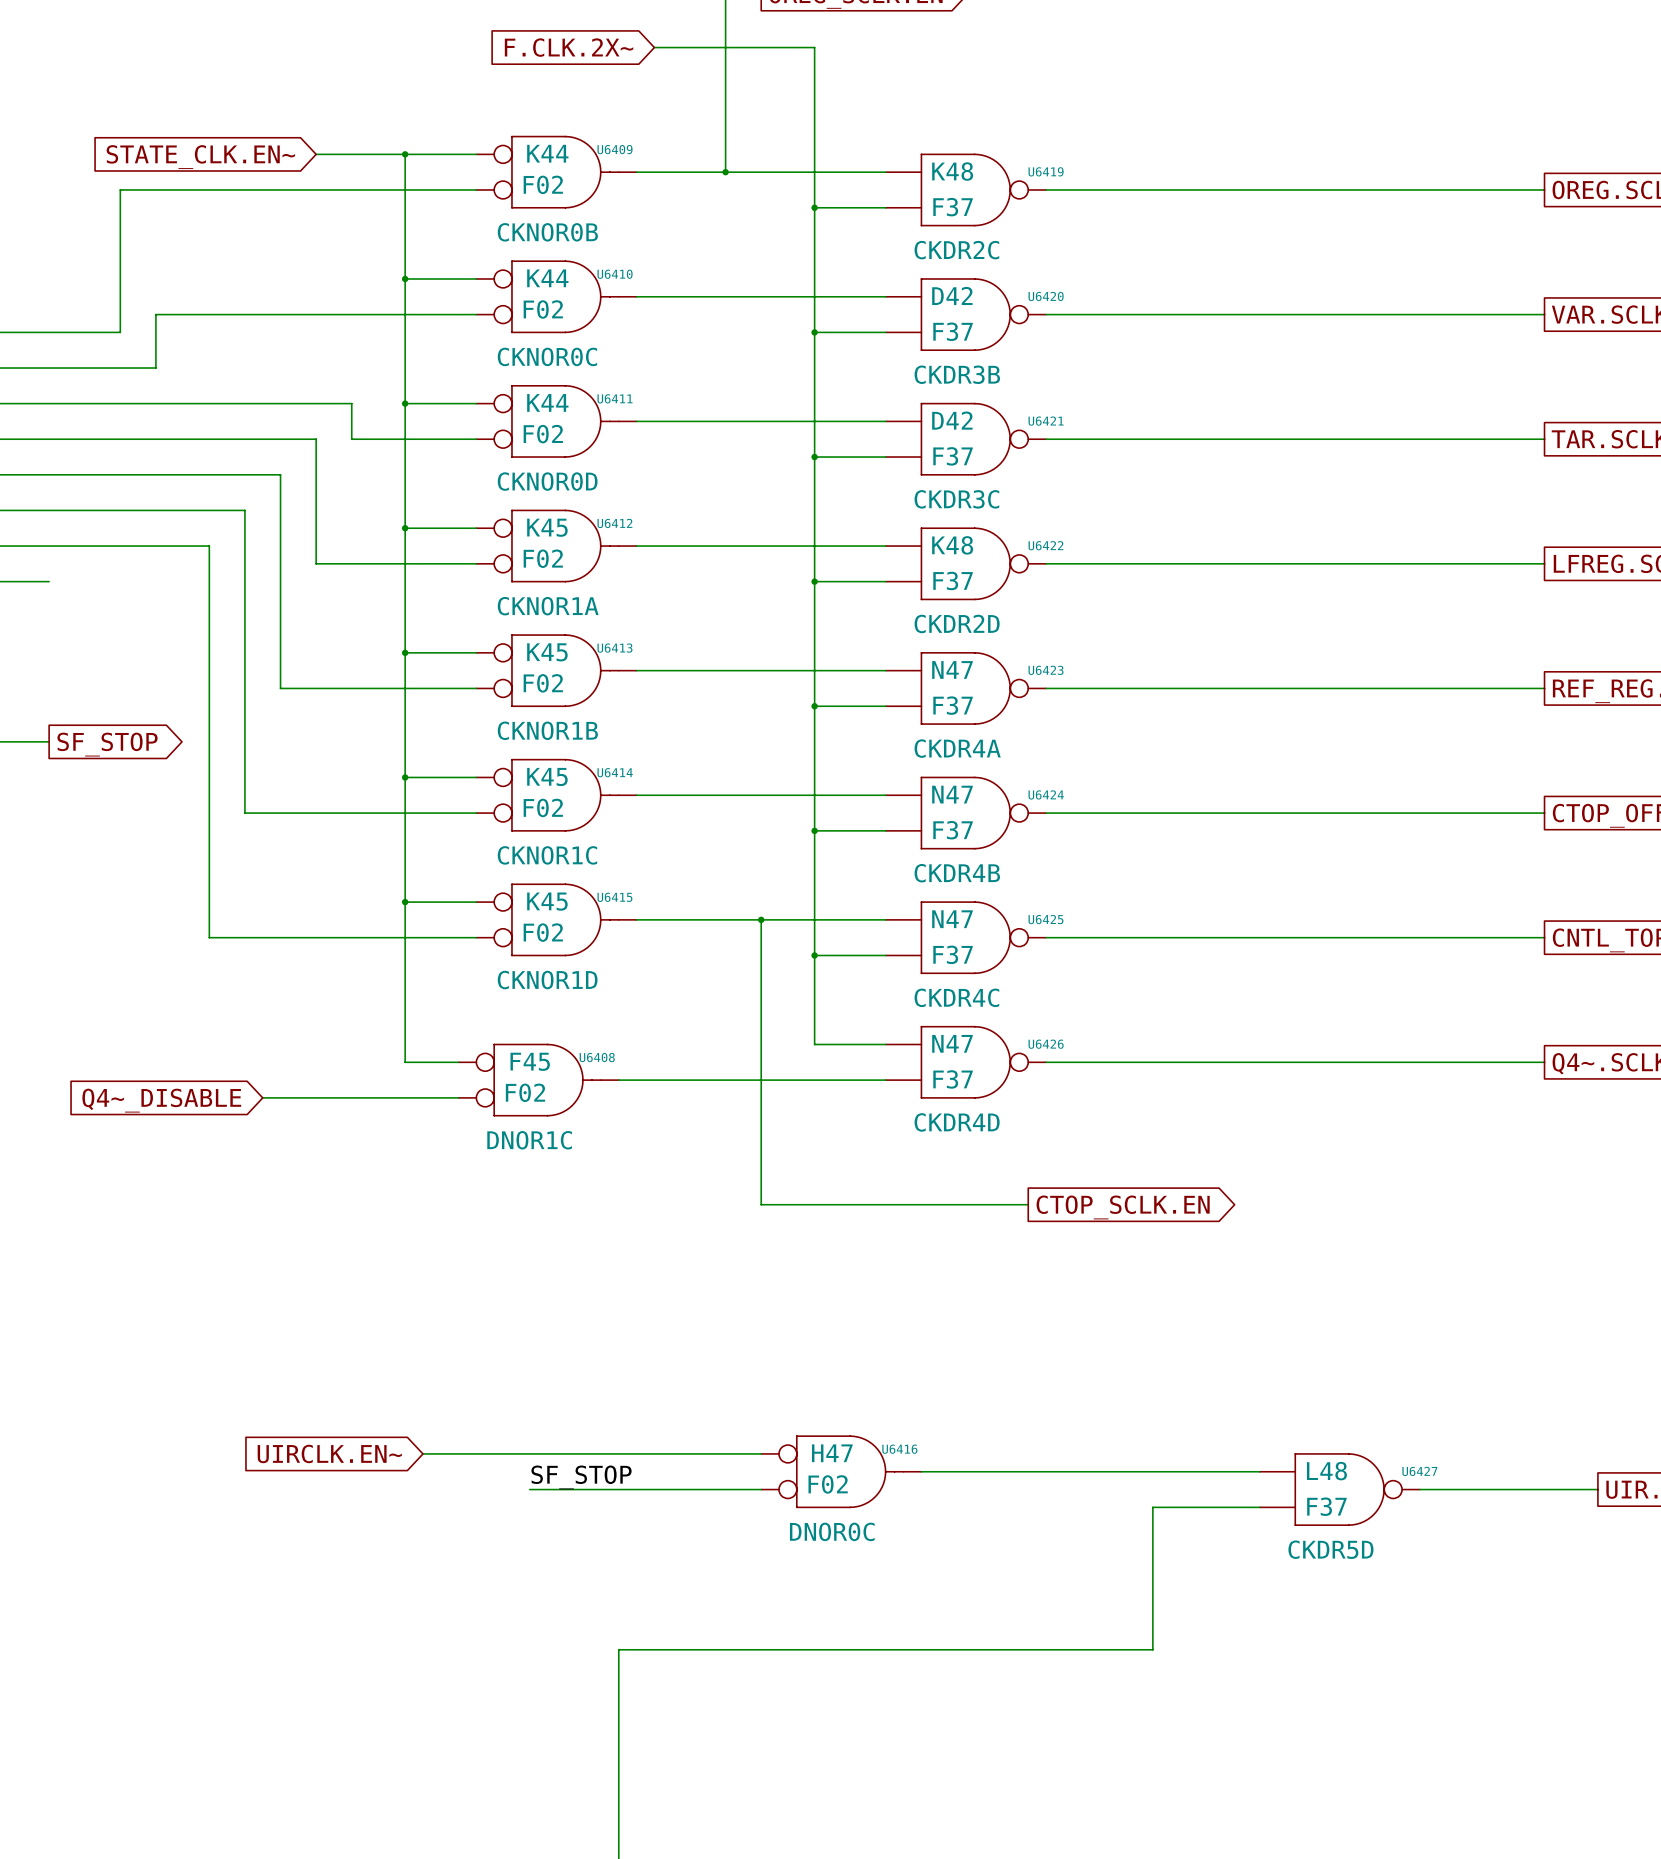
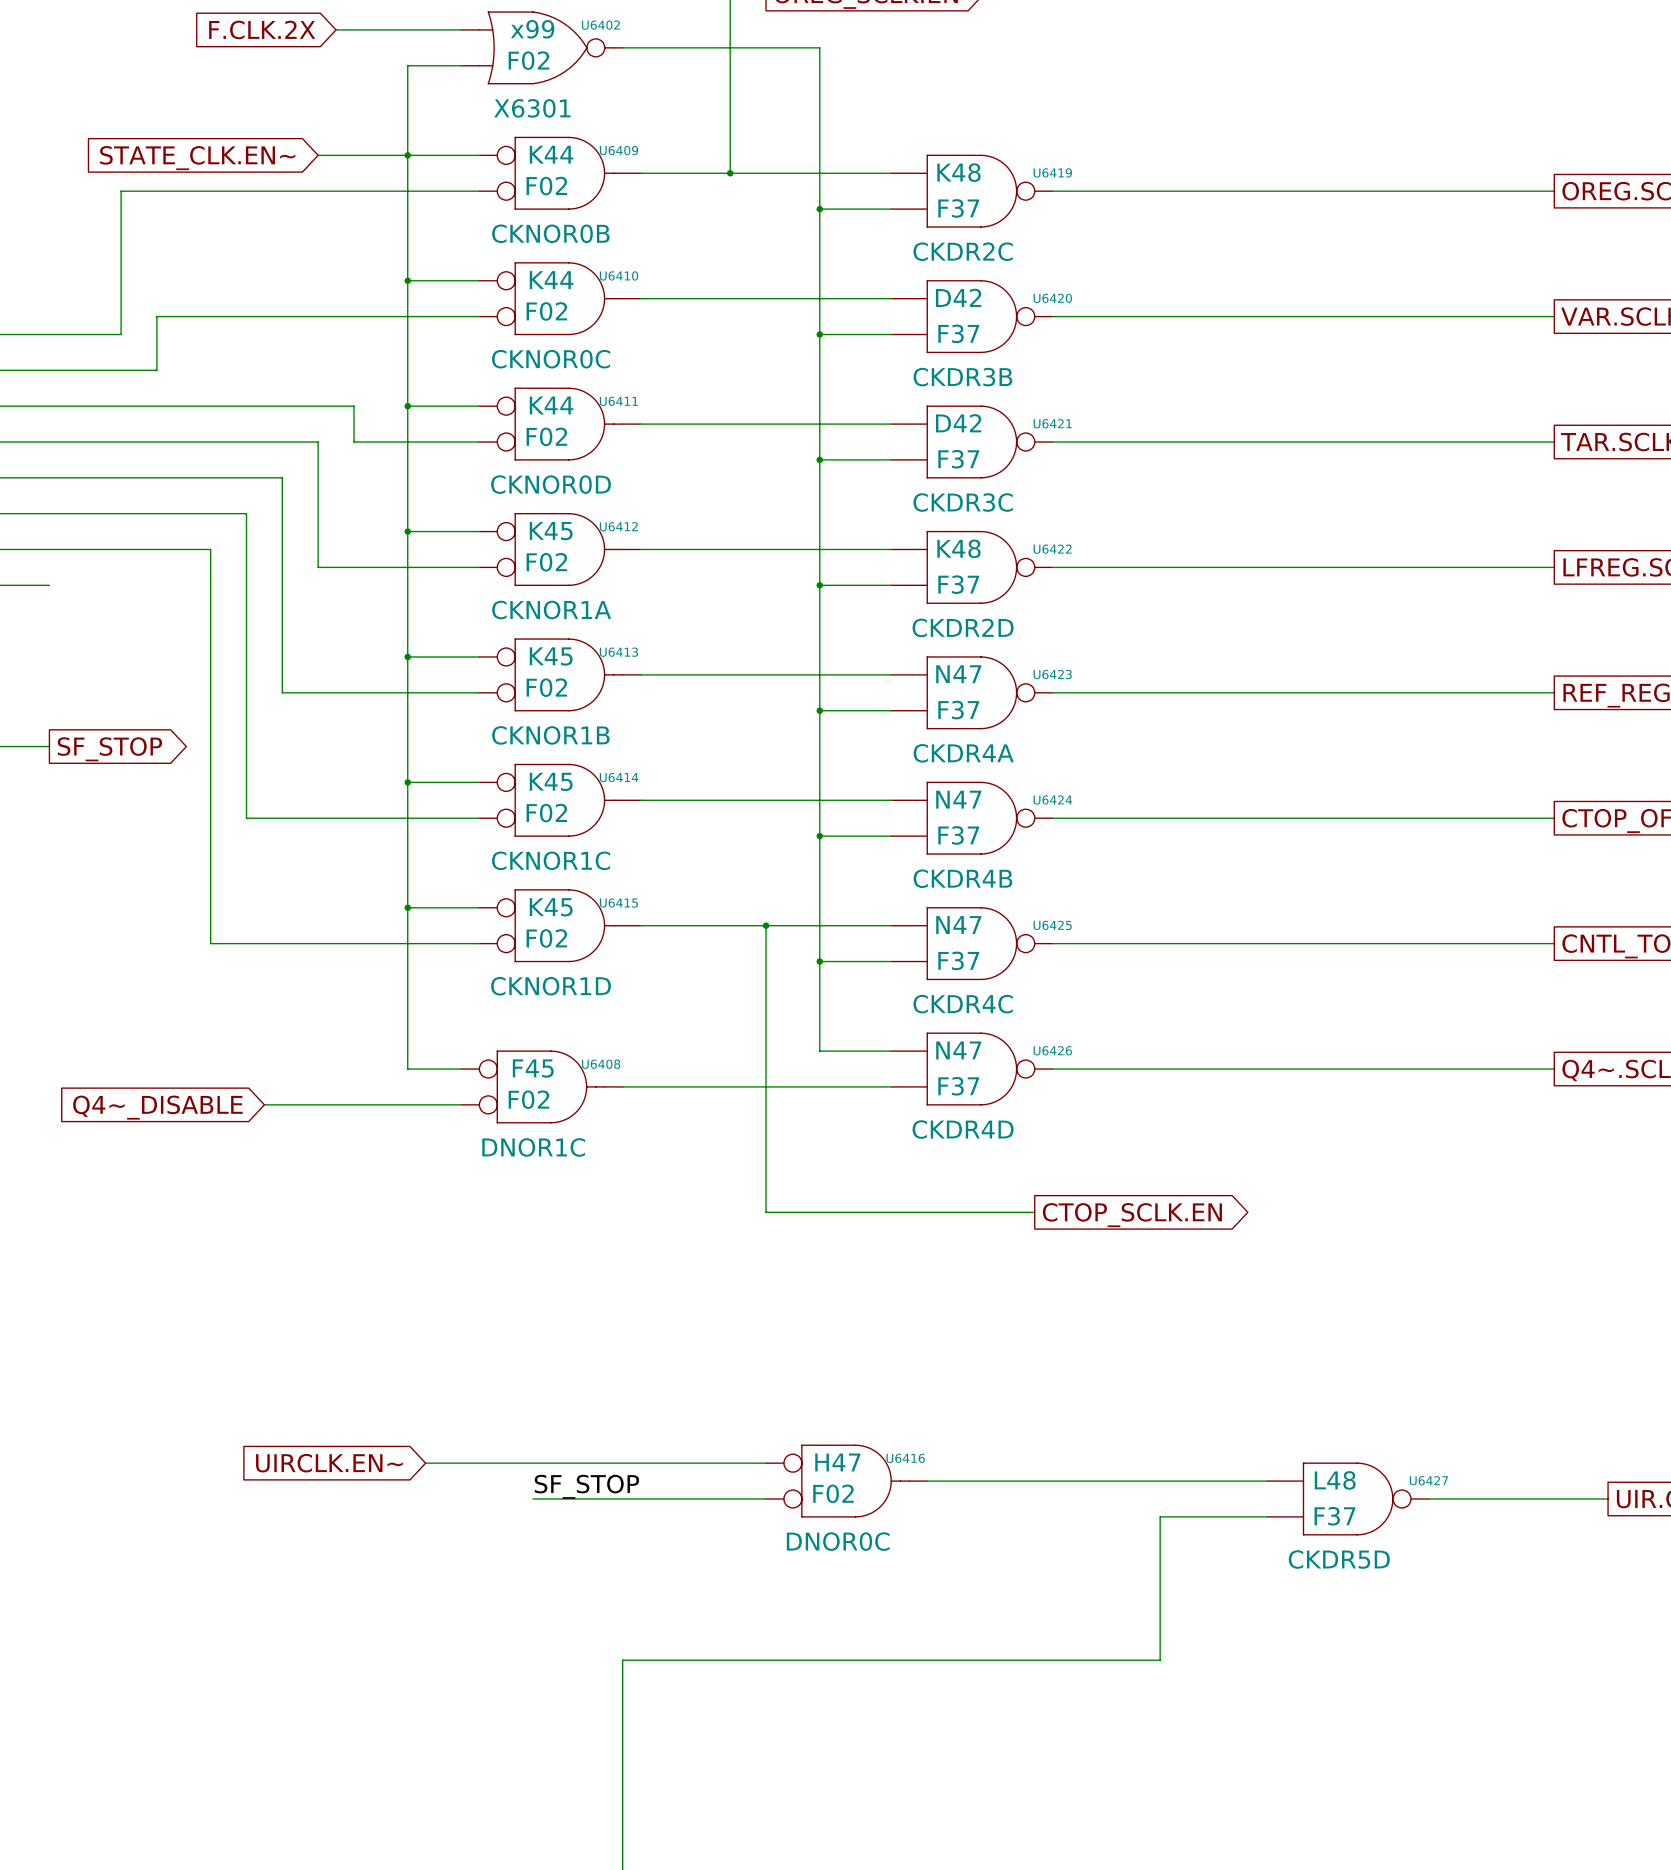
global label: none -> F.CLK.2X (262, 29)
wire: none -> (336, 29) (461, 29)
U6402: none -> F02 (542, 47)
global label: F.CLK.2X~ (569, 47) -> none
wire: none -> (622, 47) (658, 47)
wire: none -> (461, 65) (407, 65) (407, 155)

